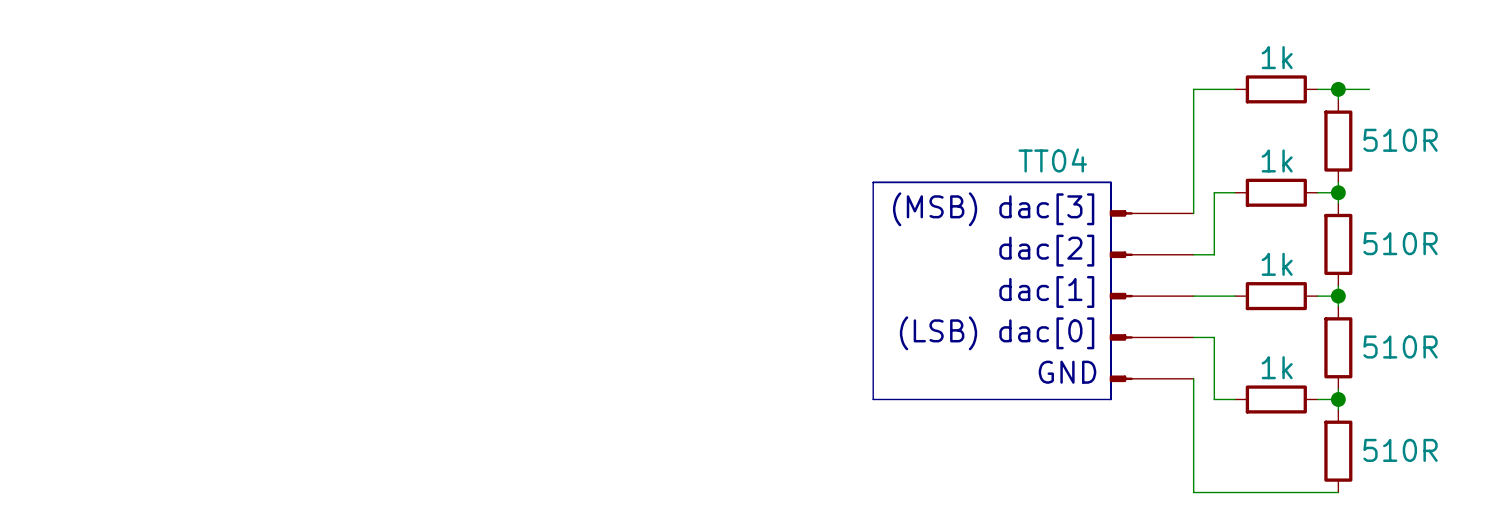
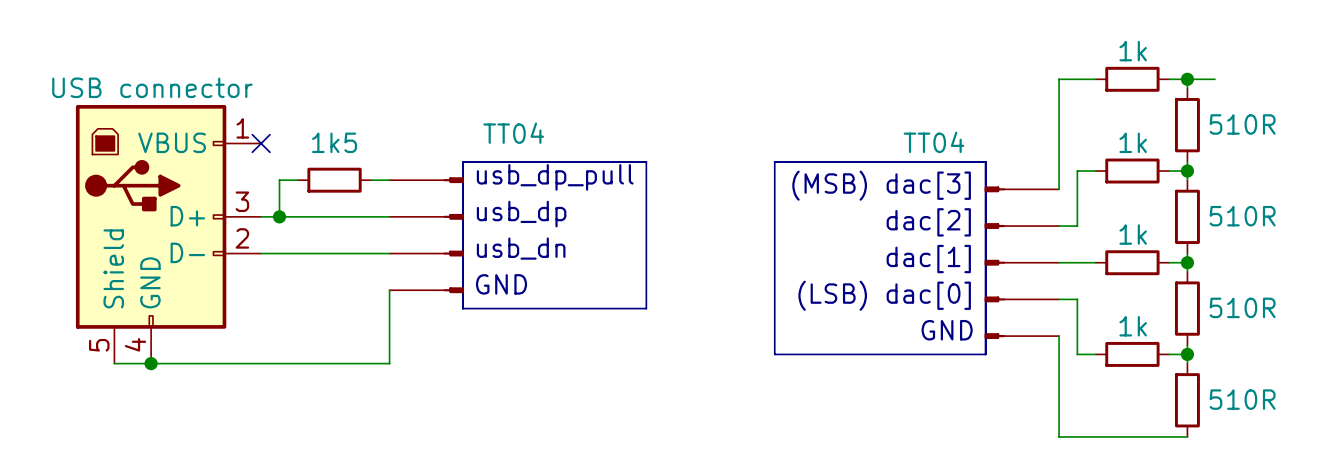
no-connect mark: none -> (261, 143)
line: none -> (462, 161) (646, 161) (646, 308) (462, 308) (462, 161)
text: none -> usb_dp_pull (555, 177)
wire: none -> (297, 180) (279, 180) (279, 216)
part: none -> 1k5 (334, 180)
wire: none -> (371, 180) (389, 180)
text: none -> usb_dp (521, 214)
wire: none -> (261, 216) (389, 216)
junction: none -> (279, 216)
part: none -> USB connector (168, 234)
part: none -> TT04 (426, 235)
text: none -> usb_dn (521, 248)
wire: none -> (261, 253) (389, 253)
text: none -> GND (501, 284)
wire: none -> (389, 290) (389, 363) (114, 363)
junction: none -> (151, 363)

